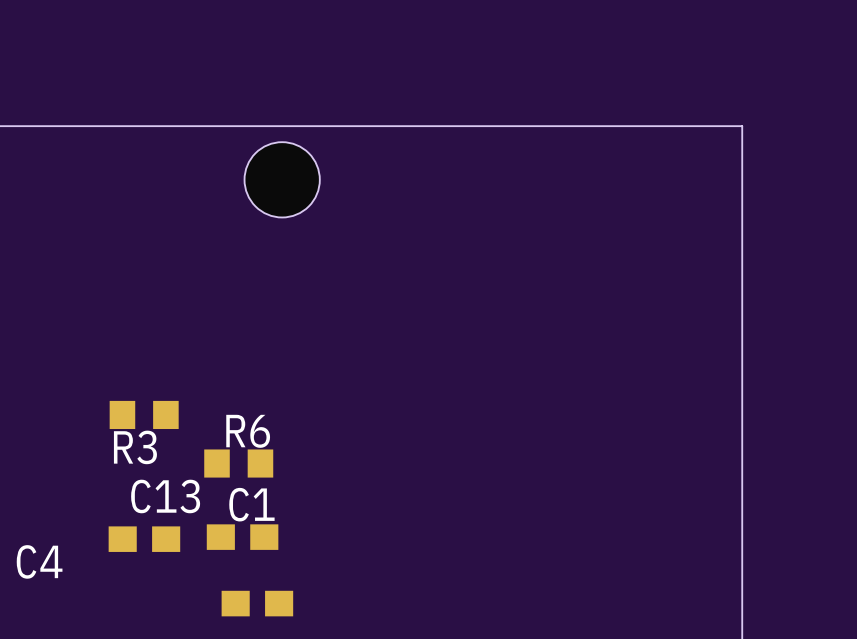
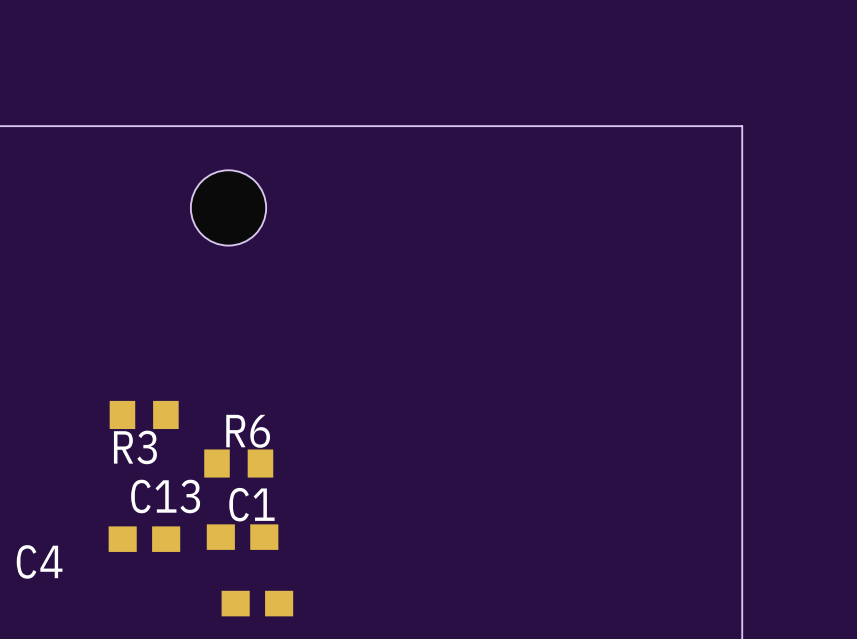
hole position: (282, 179) -> (228, 207)

